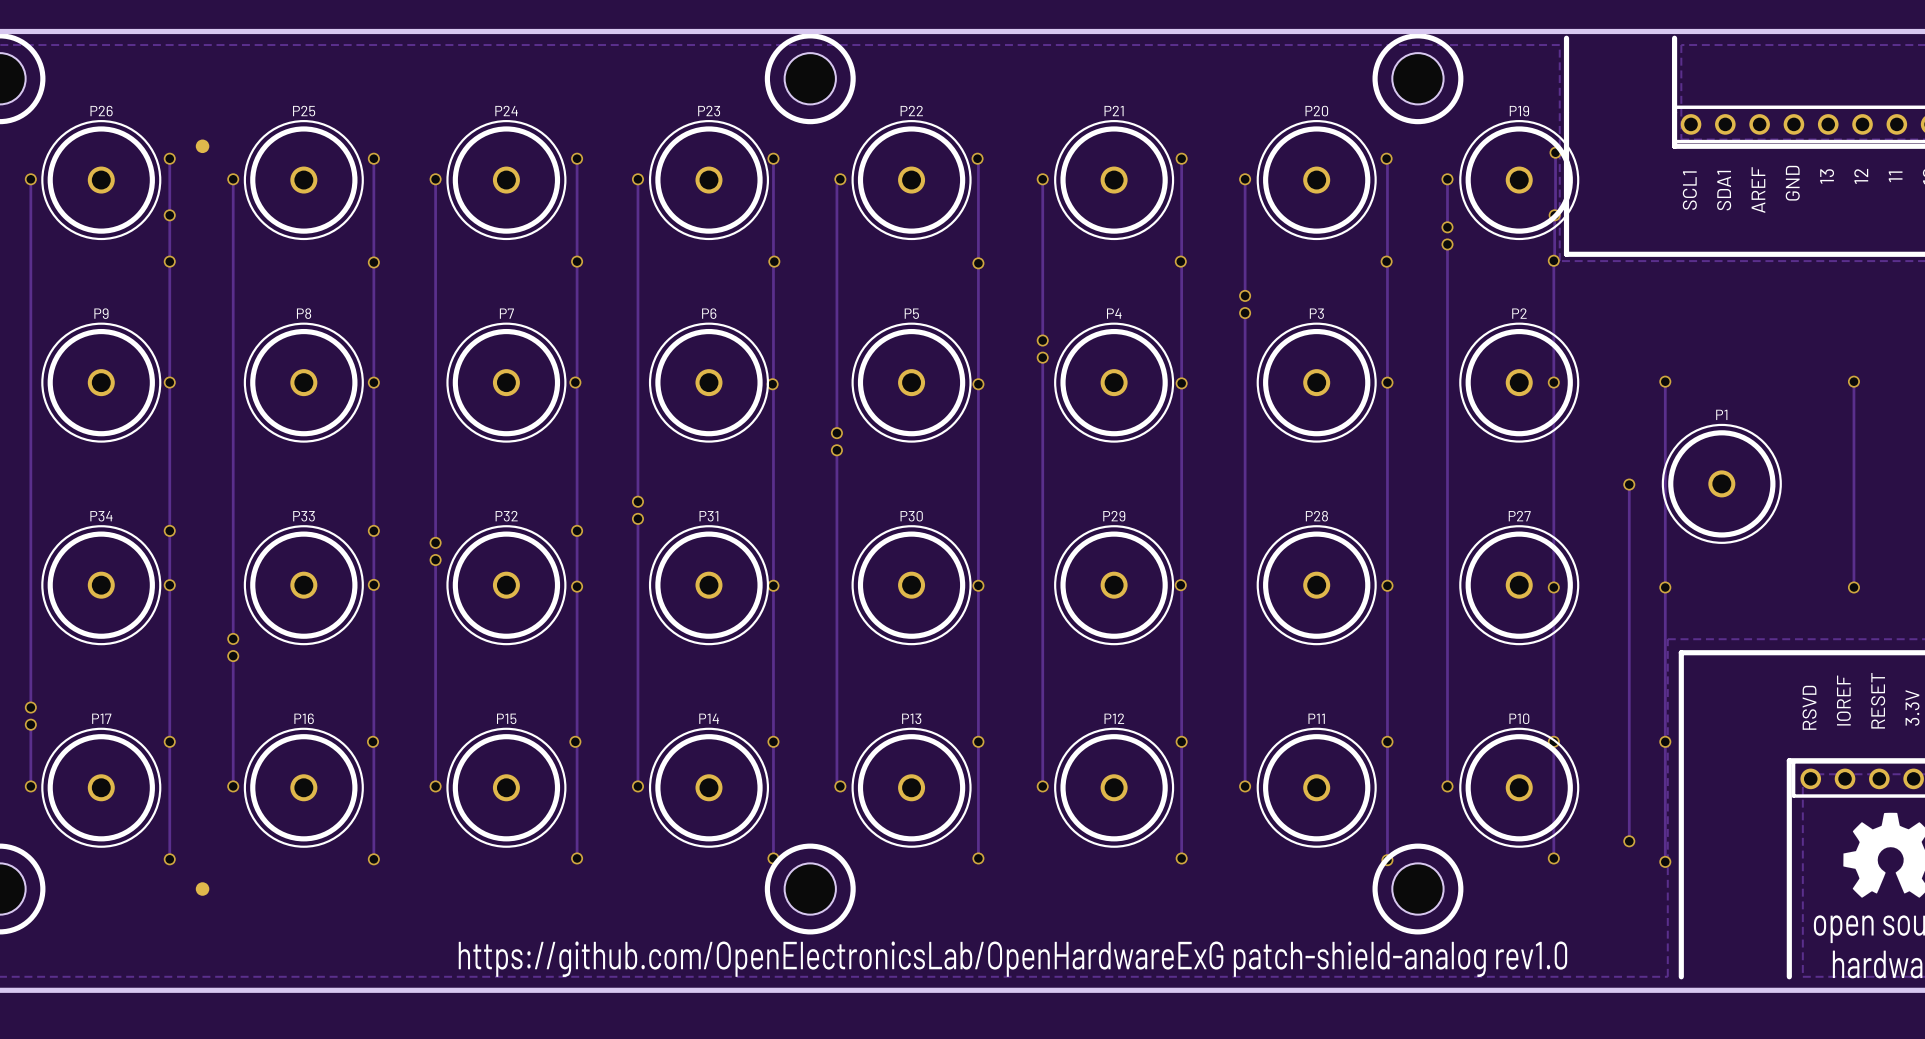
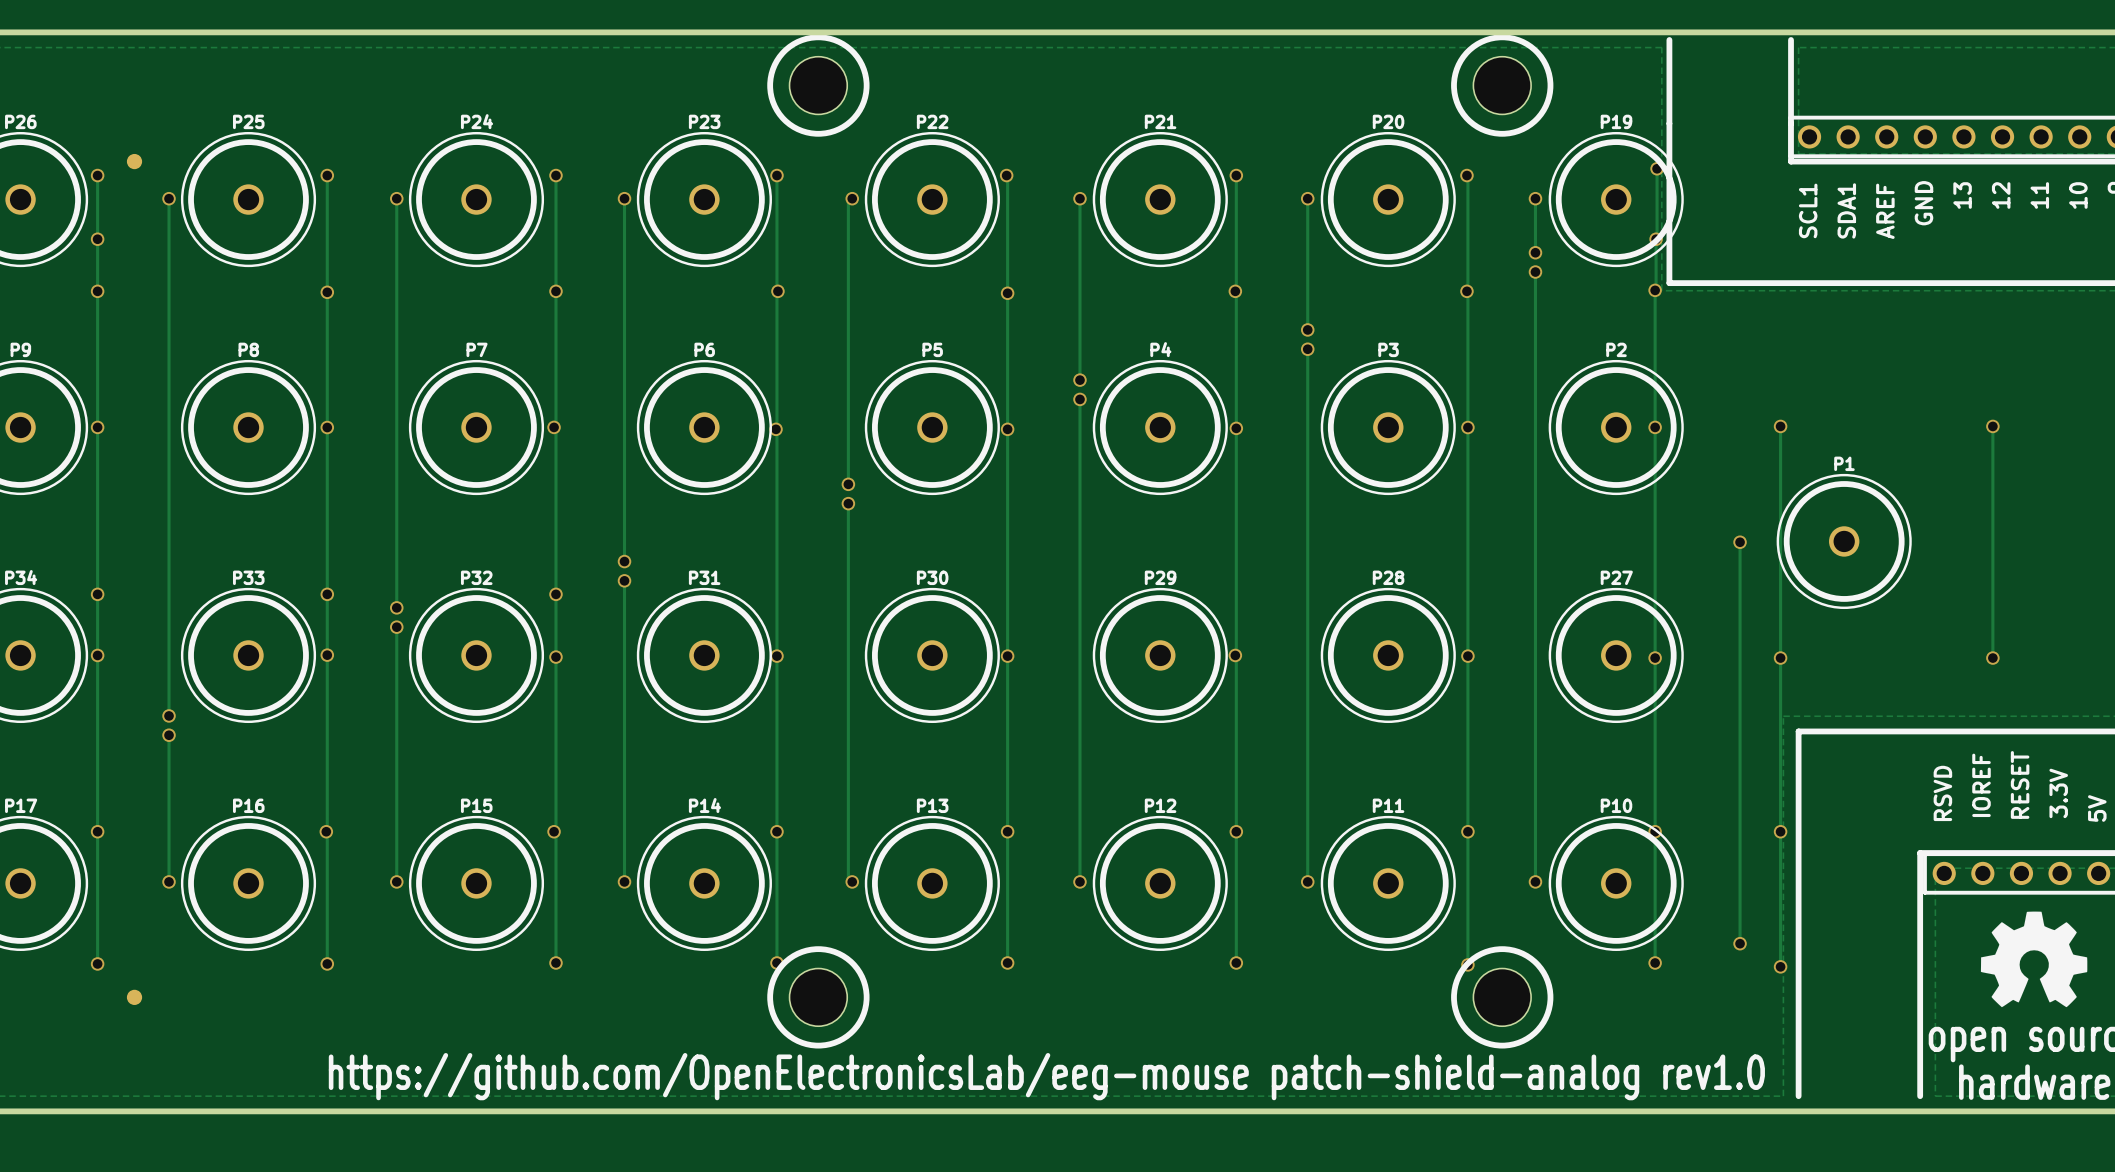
text: https://github.com/OpenElectronicsLab/OpenHardwareExG patch-shield-analog rev1.0 (1012, 959) -> https://github.com/OpenElectronicsLab/eeg-mouse patch-shield-analog rev1.0 (1046, 1076)

